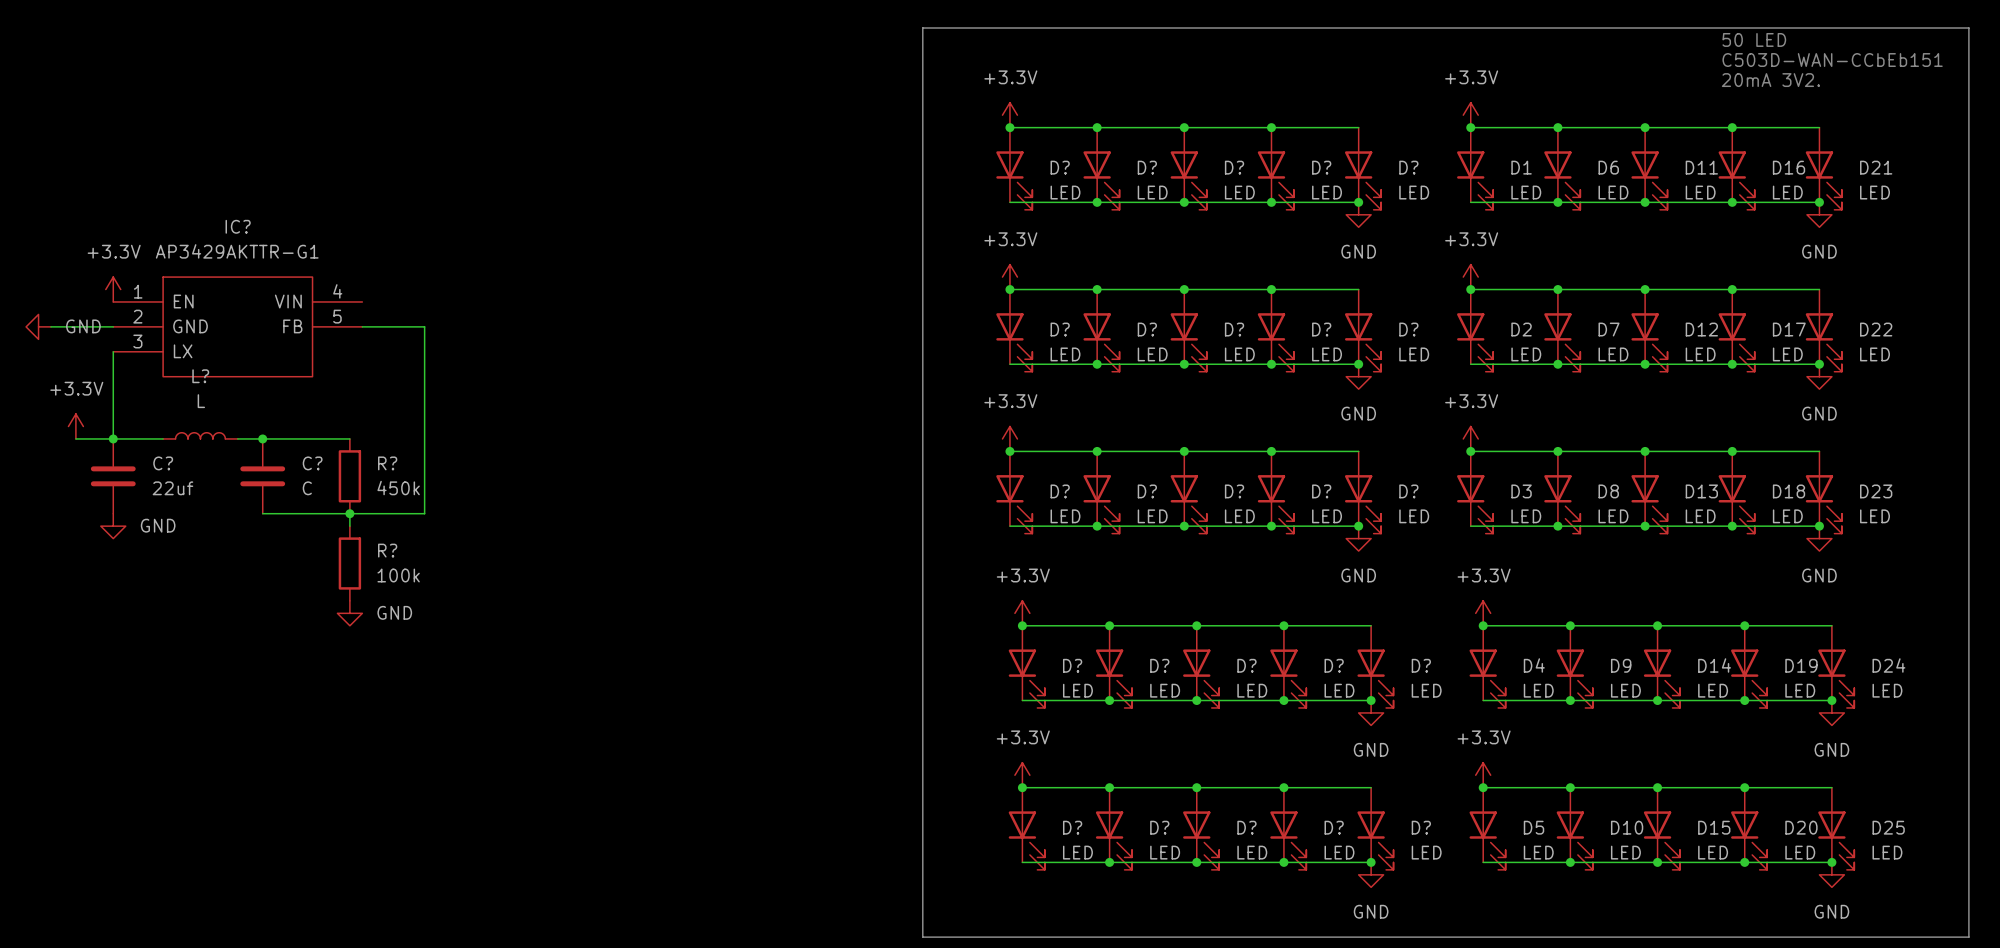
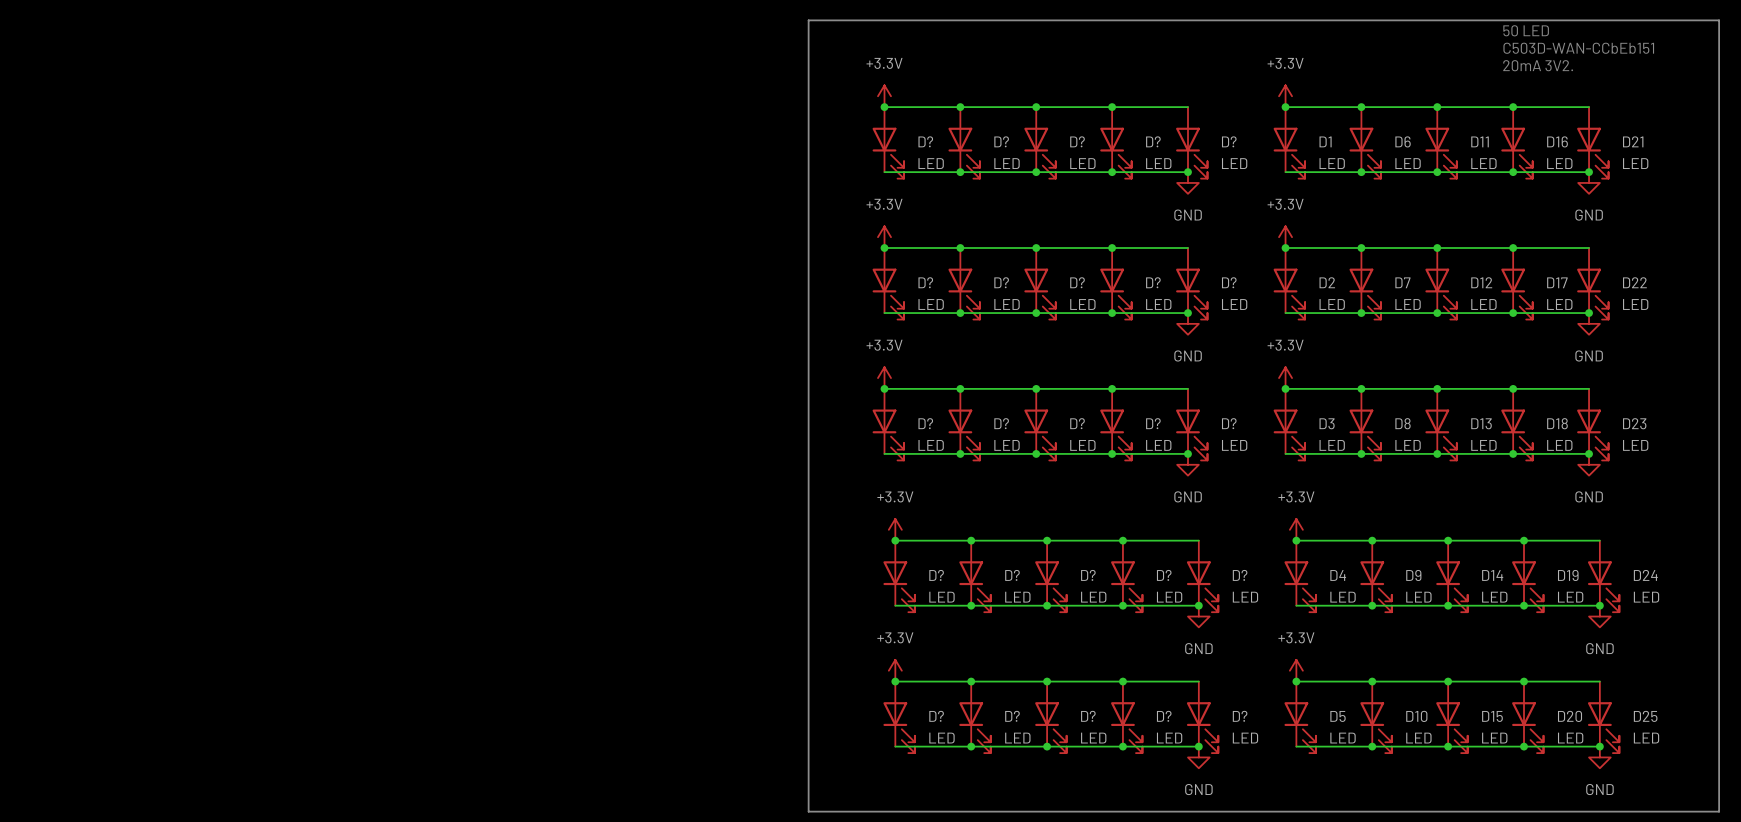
power symbol: +3.3V (113, 289) -> none
power symbol: GND (38, 326) -> none
wire: (51, 326) (113, 326) -> none
IC?: AP3429AKTTR-G1 (237, 326) -> none
wire: (362, 326) (424, 326) (424, 513) (262, 513) -> none
wire: (113, 351) (113, 438) -> none
power symbol: +3.3V (75, 426) -> none
L?: L (200, 435) -> none
wire: (75, 438) (163, 438) -> none
junction: (113, 438) -> none
wire: (237, 438) (349, 438) -> none
junction: (262, 438) -> none
C?: 22uf (113, 476) -> none
C?: C (262, 476) -> none
R?: 450k (349, 476) -> none
wire: (349, 513) (349, 526) -> none
junction: (349, 513) -> none
power symbol: GND (113, 526) -> none
R?: 100k (349, 563) -> none
power symbol: GND (349, 613) -> none

